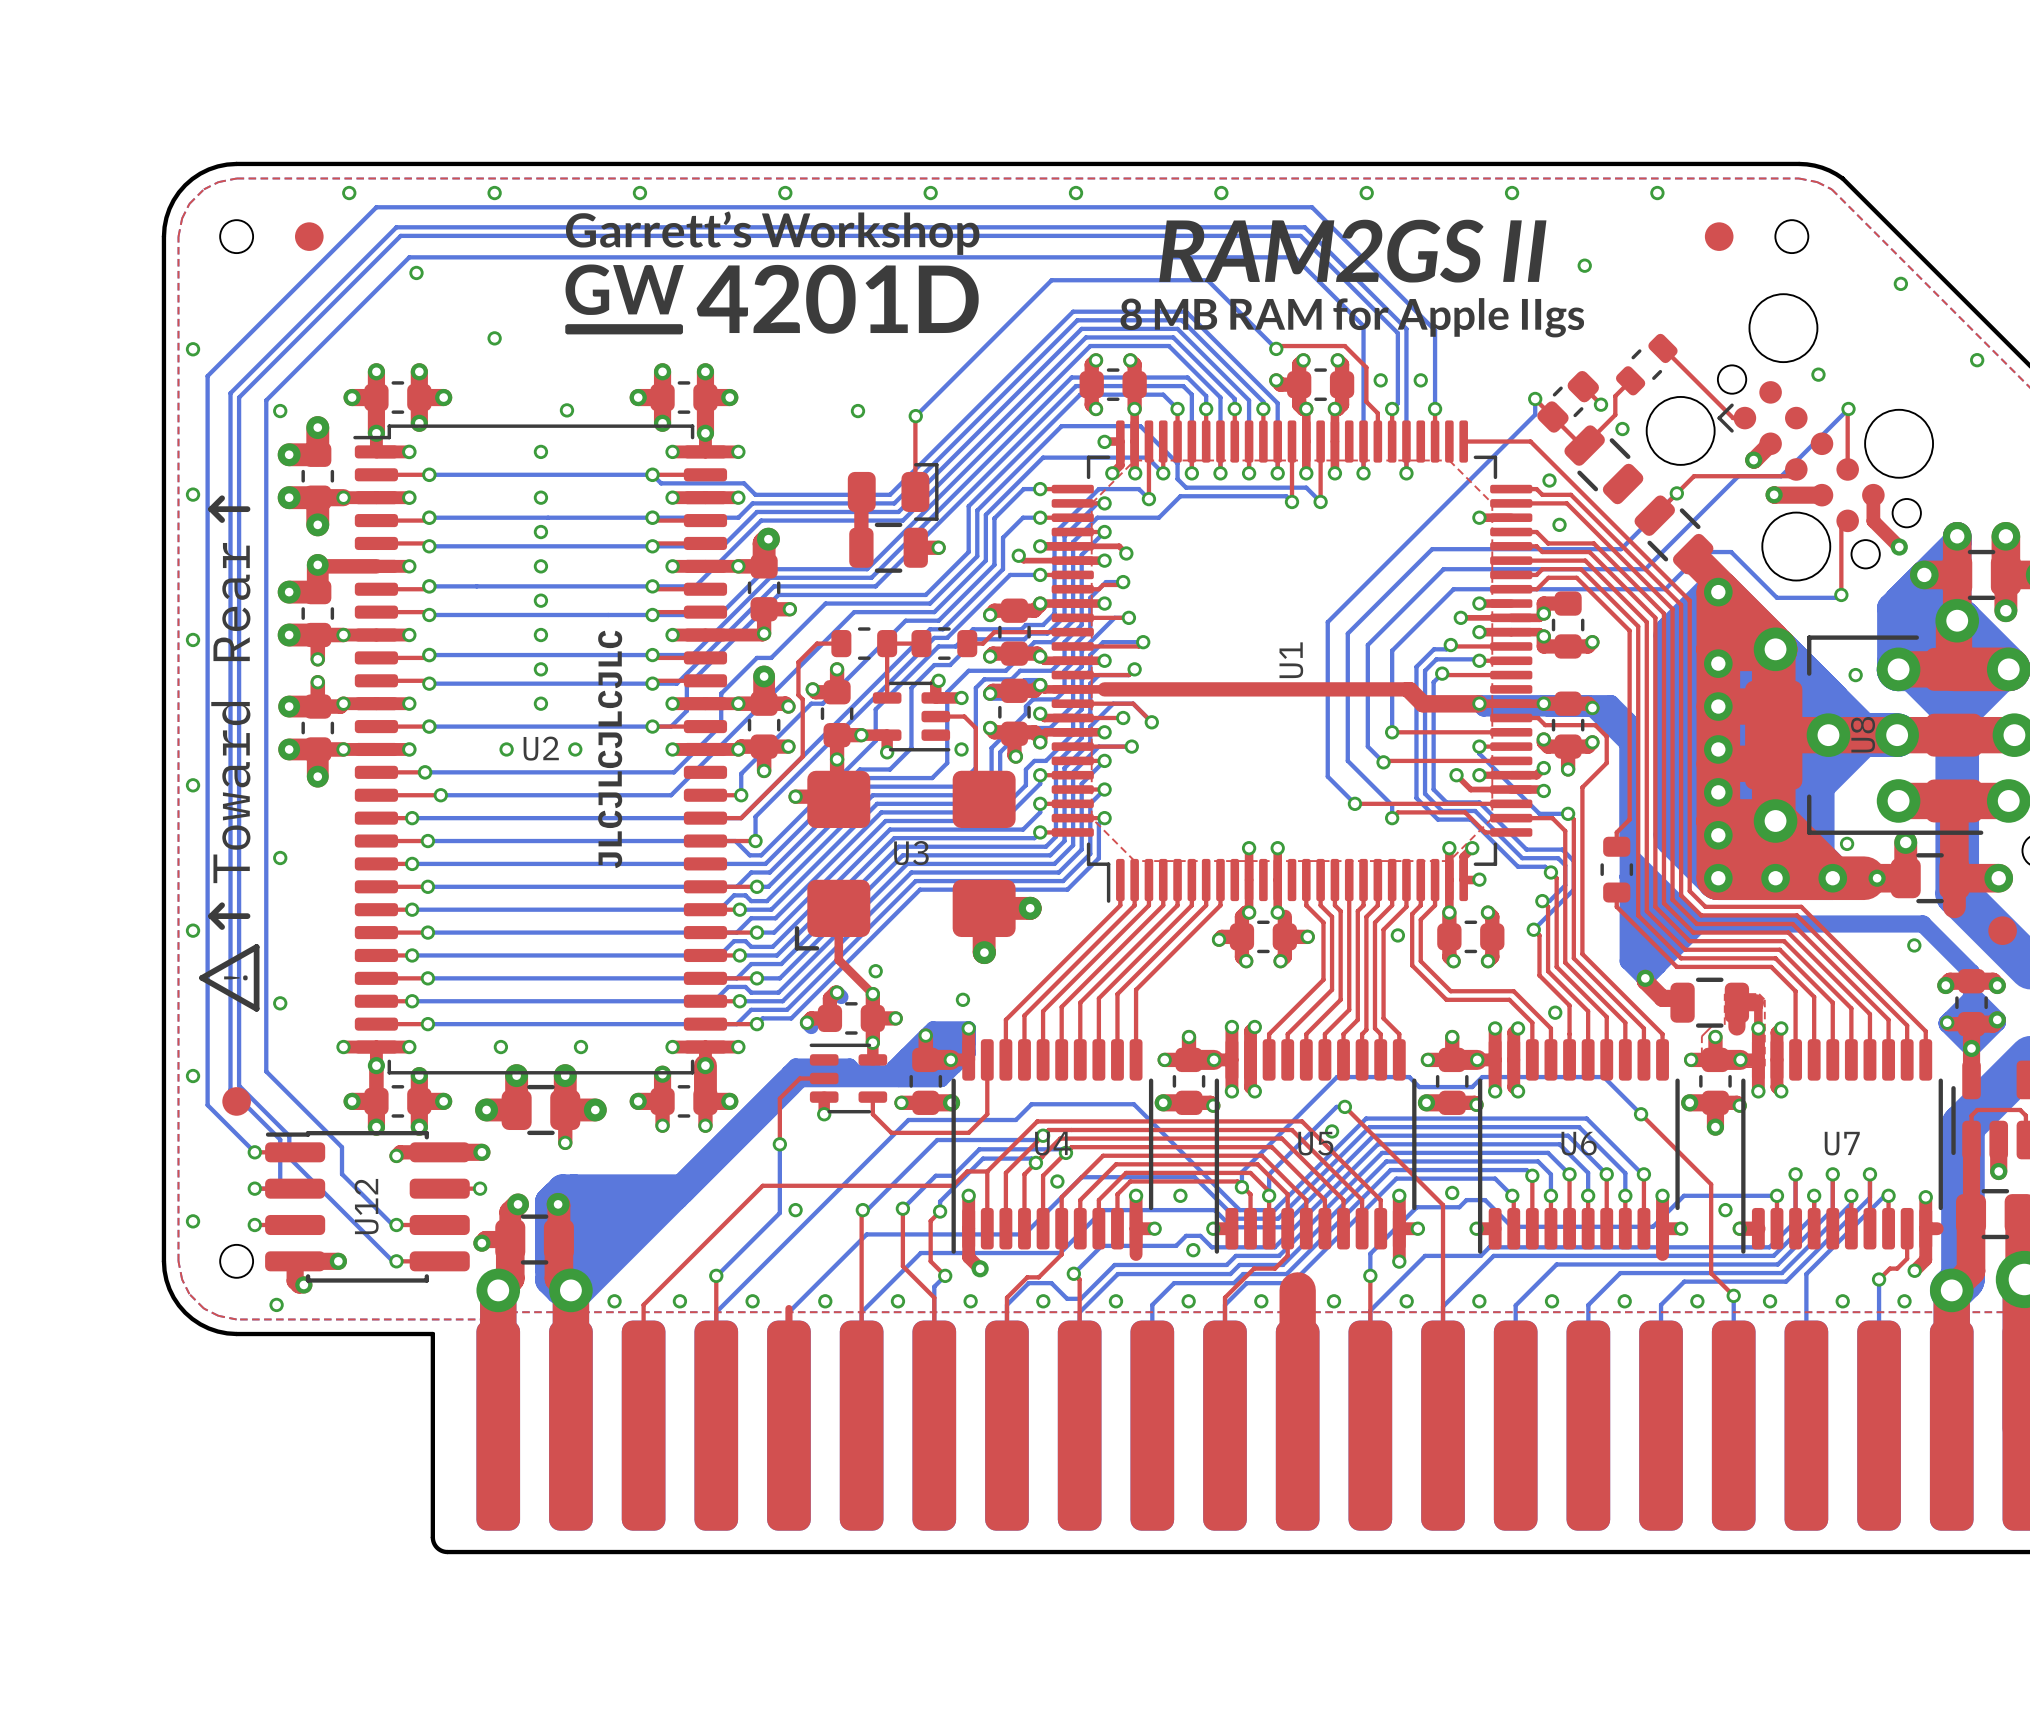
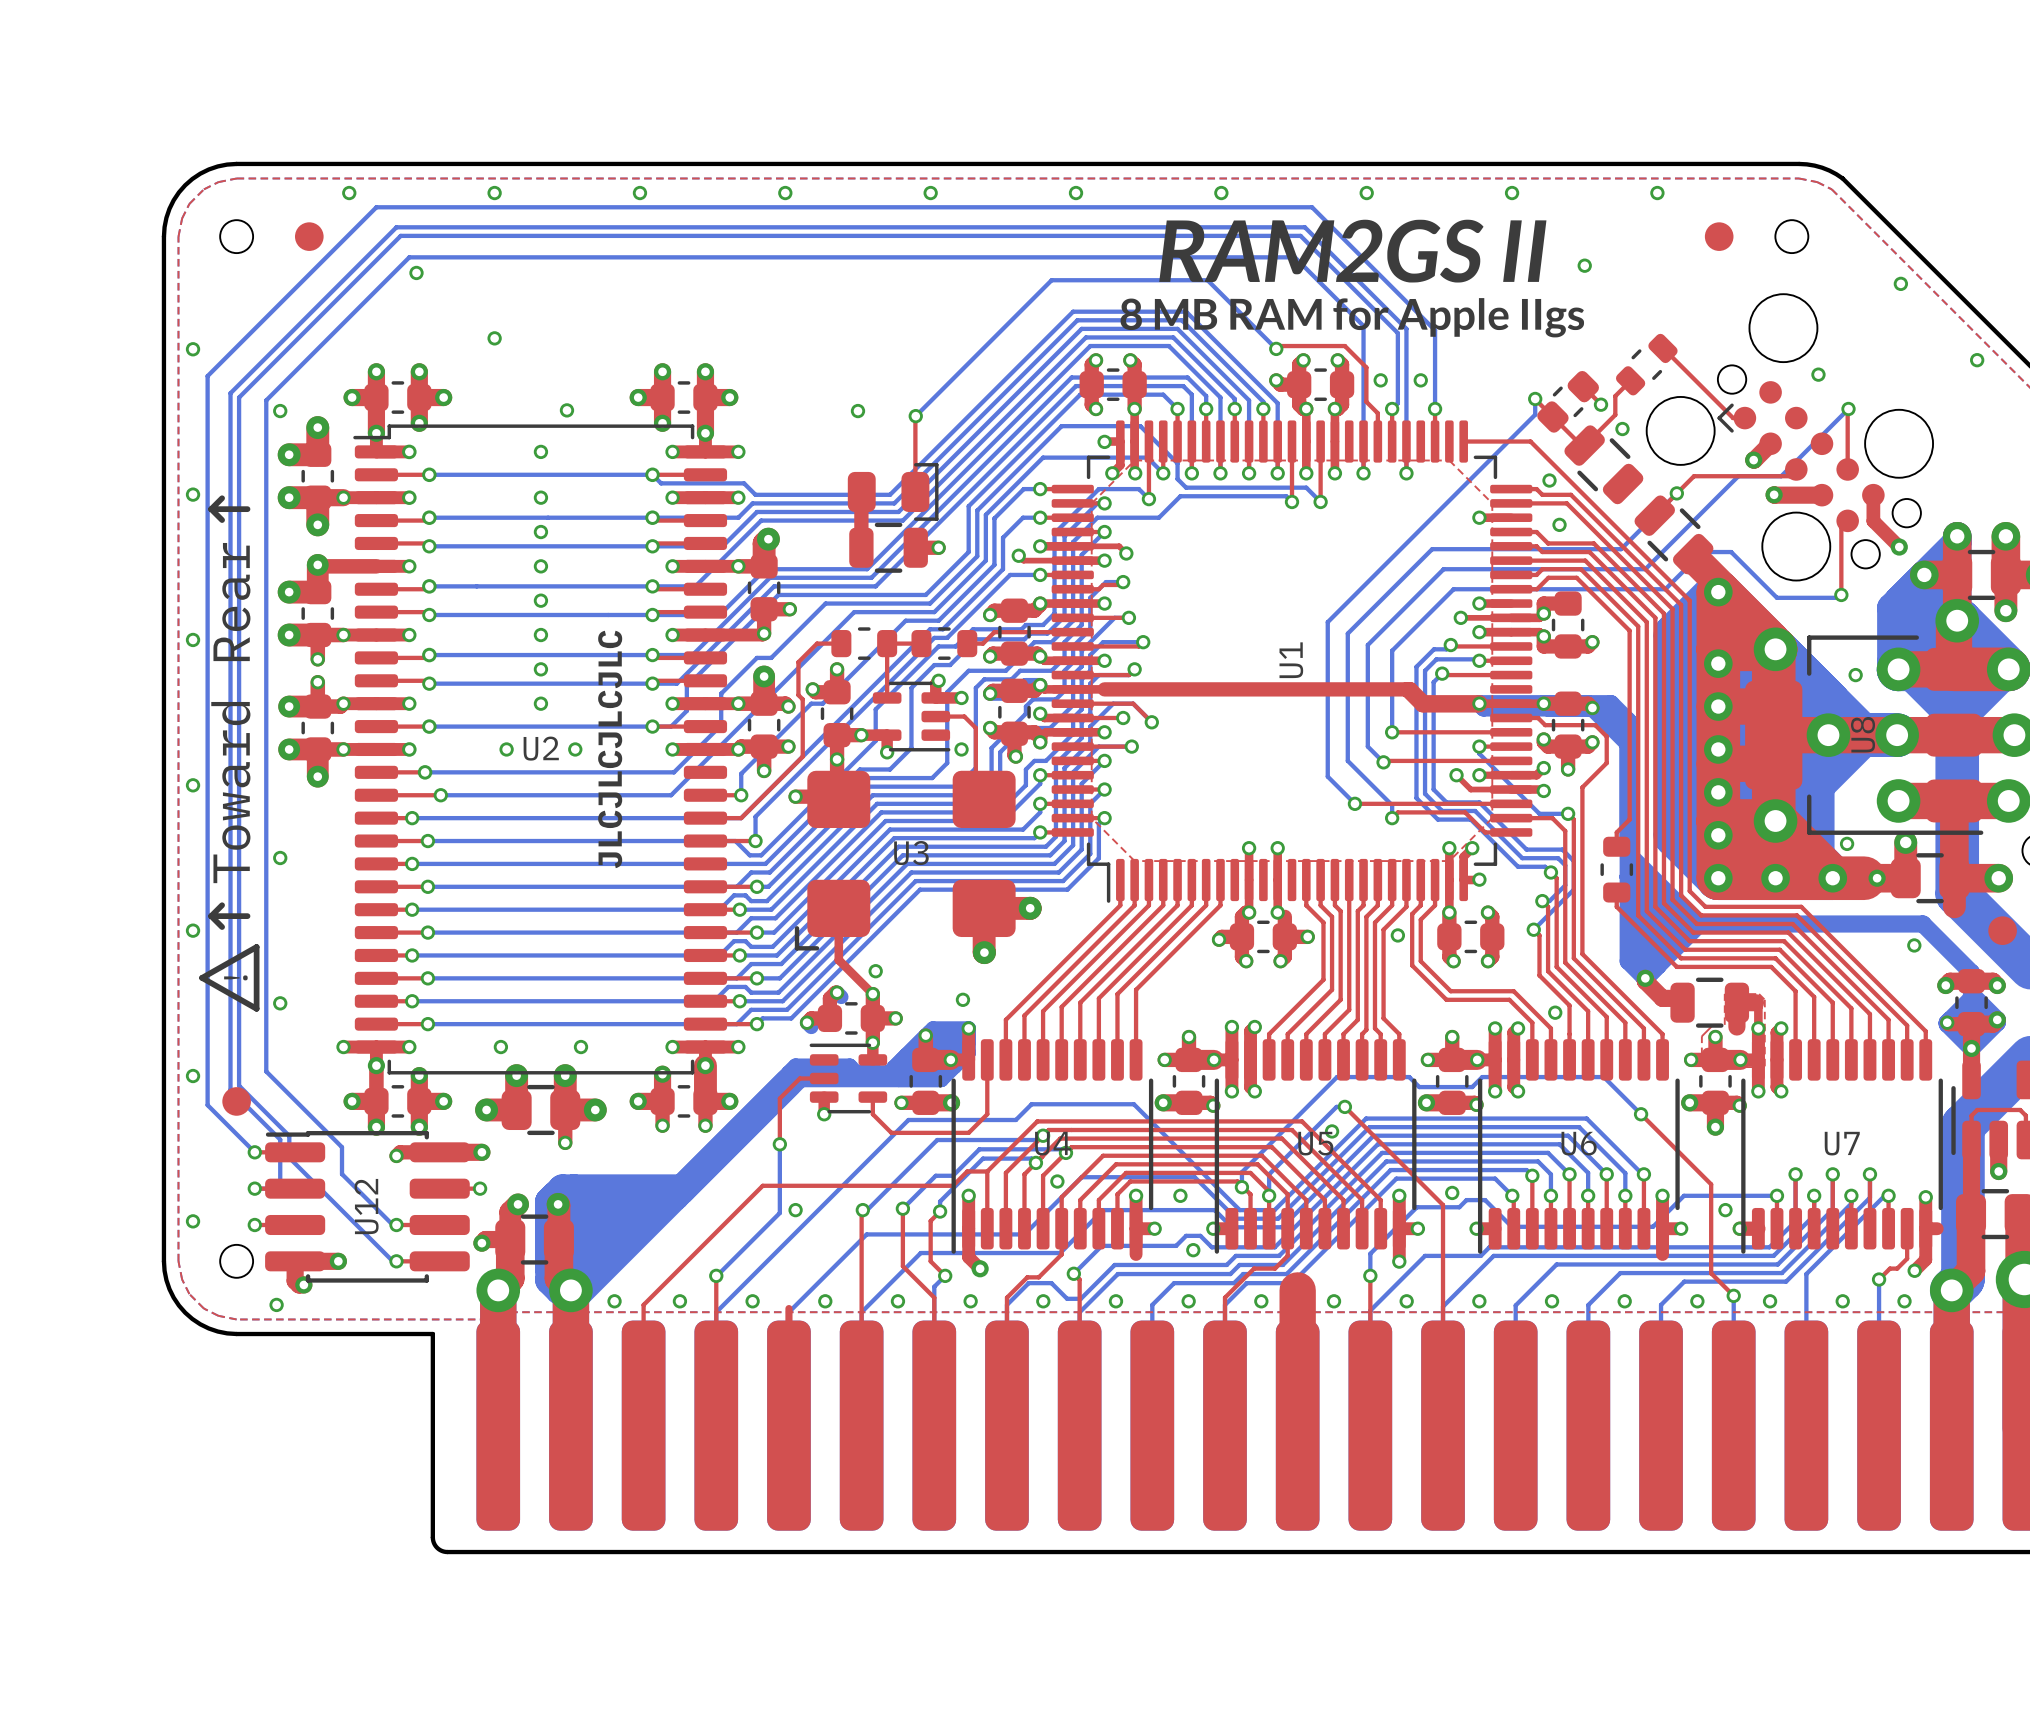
drawing: [565, 211, 980, 335] -> none

